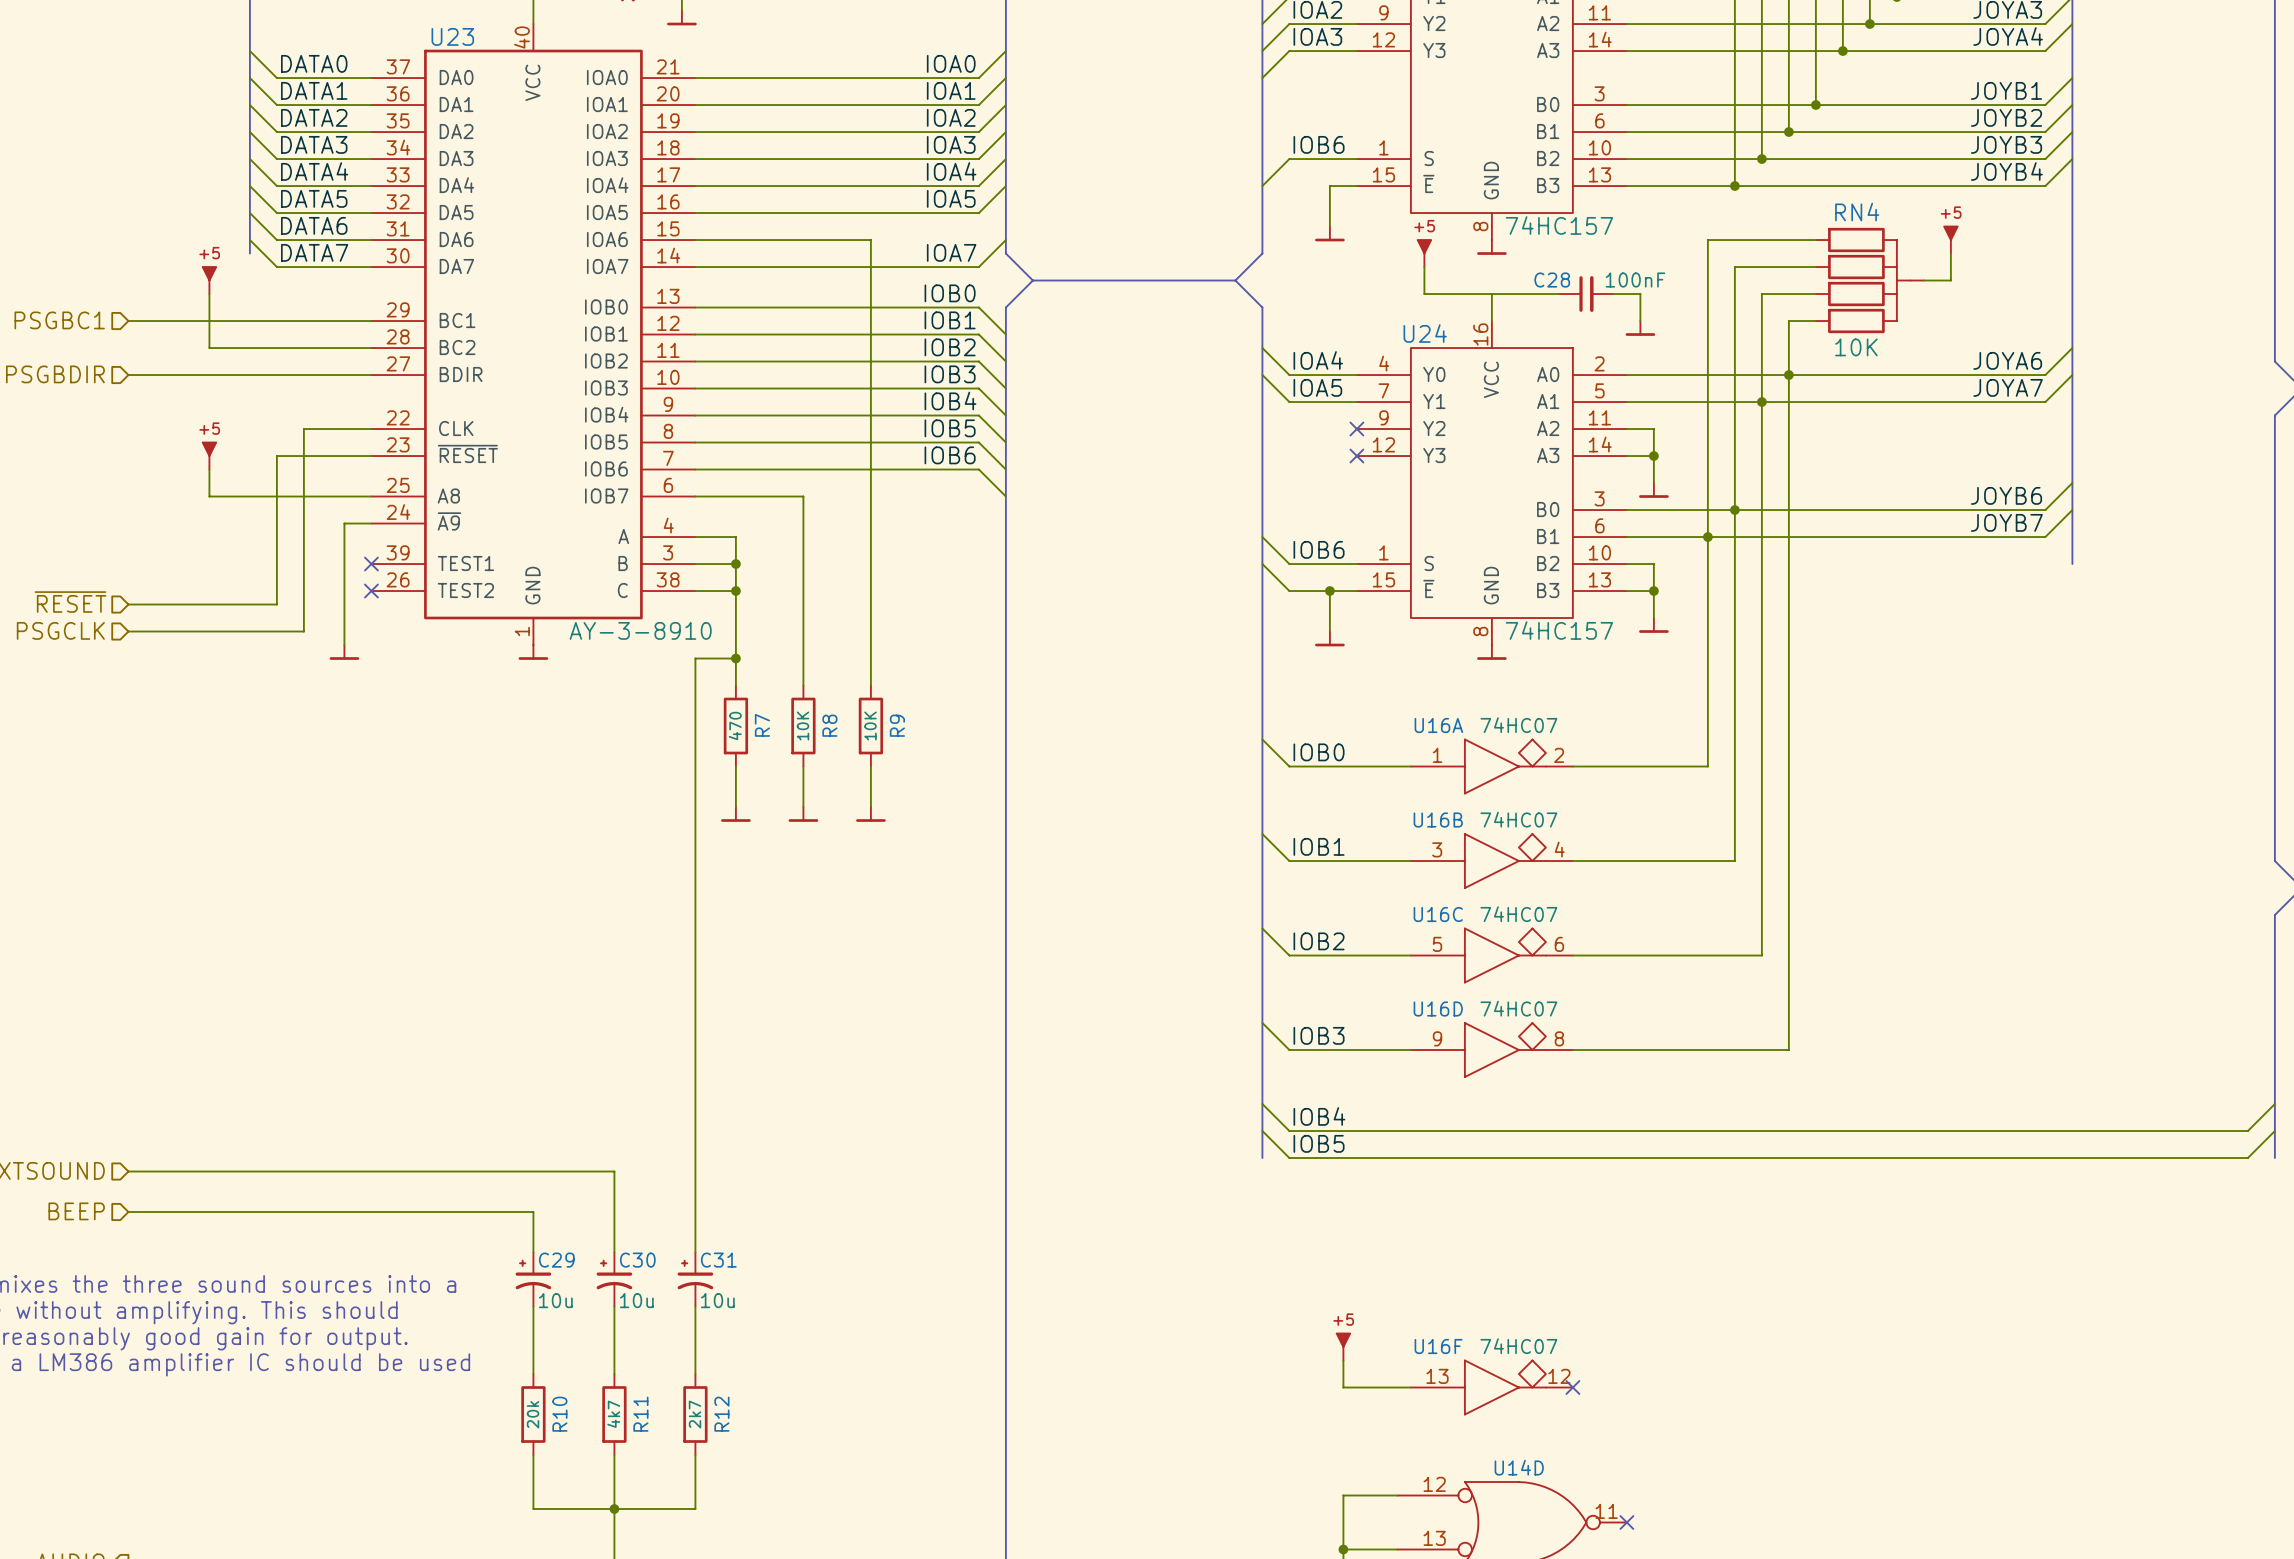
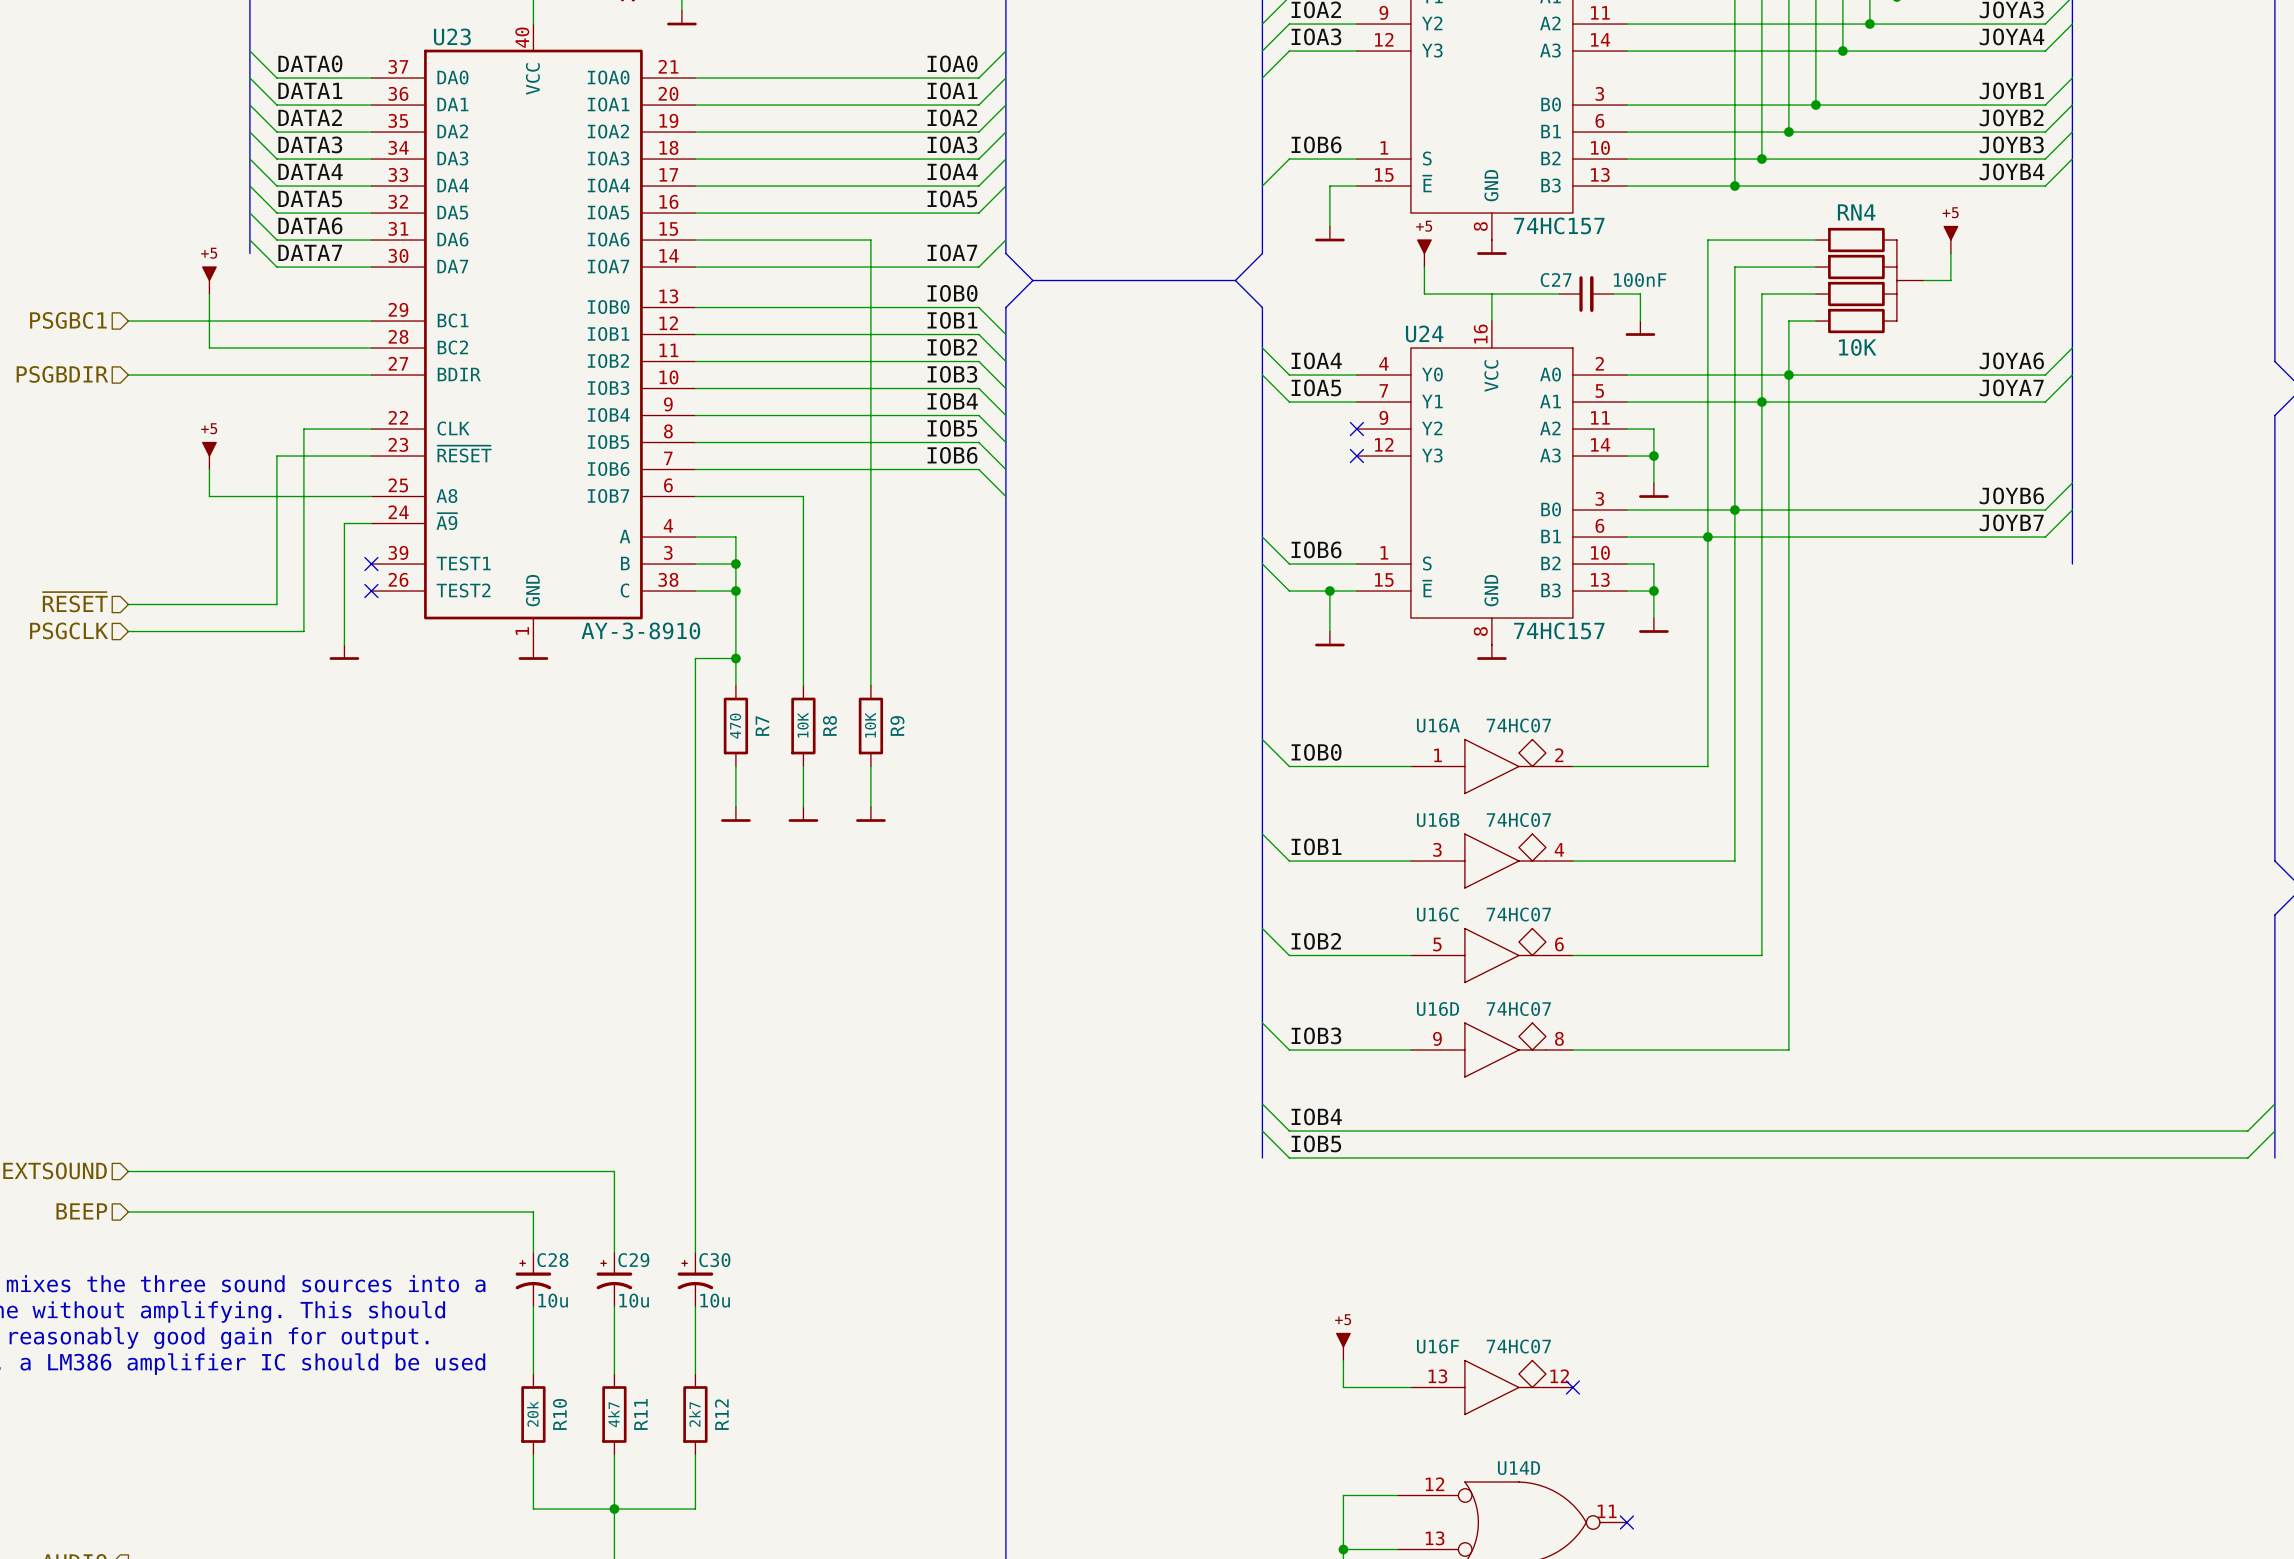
C28 name: C28 (1552, 280) -> C27 (1556, 280)
C29 name: C29 (556, 1260) -> C28 (552, 1260)
C30 name: C30 (637, 1260) -> C29 (633, 1260)
C31 name: C31 (718, 1260) -> C30 (714, 1260)

